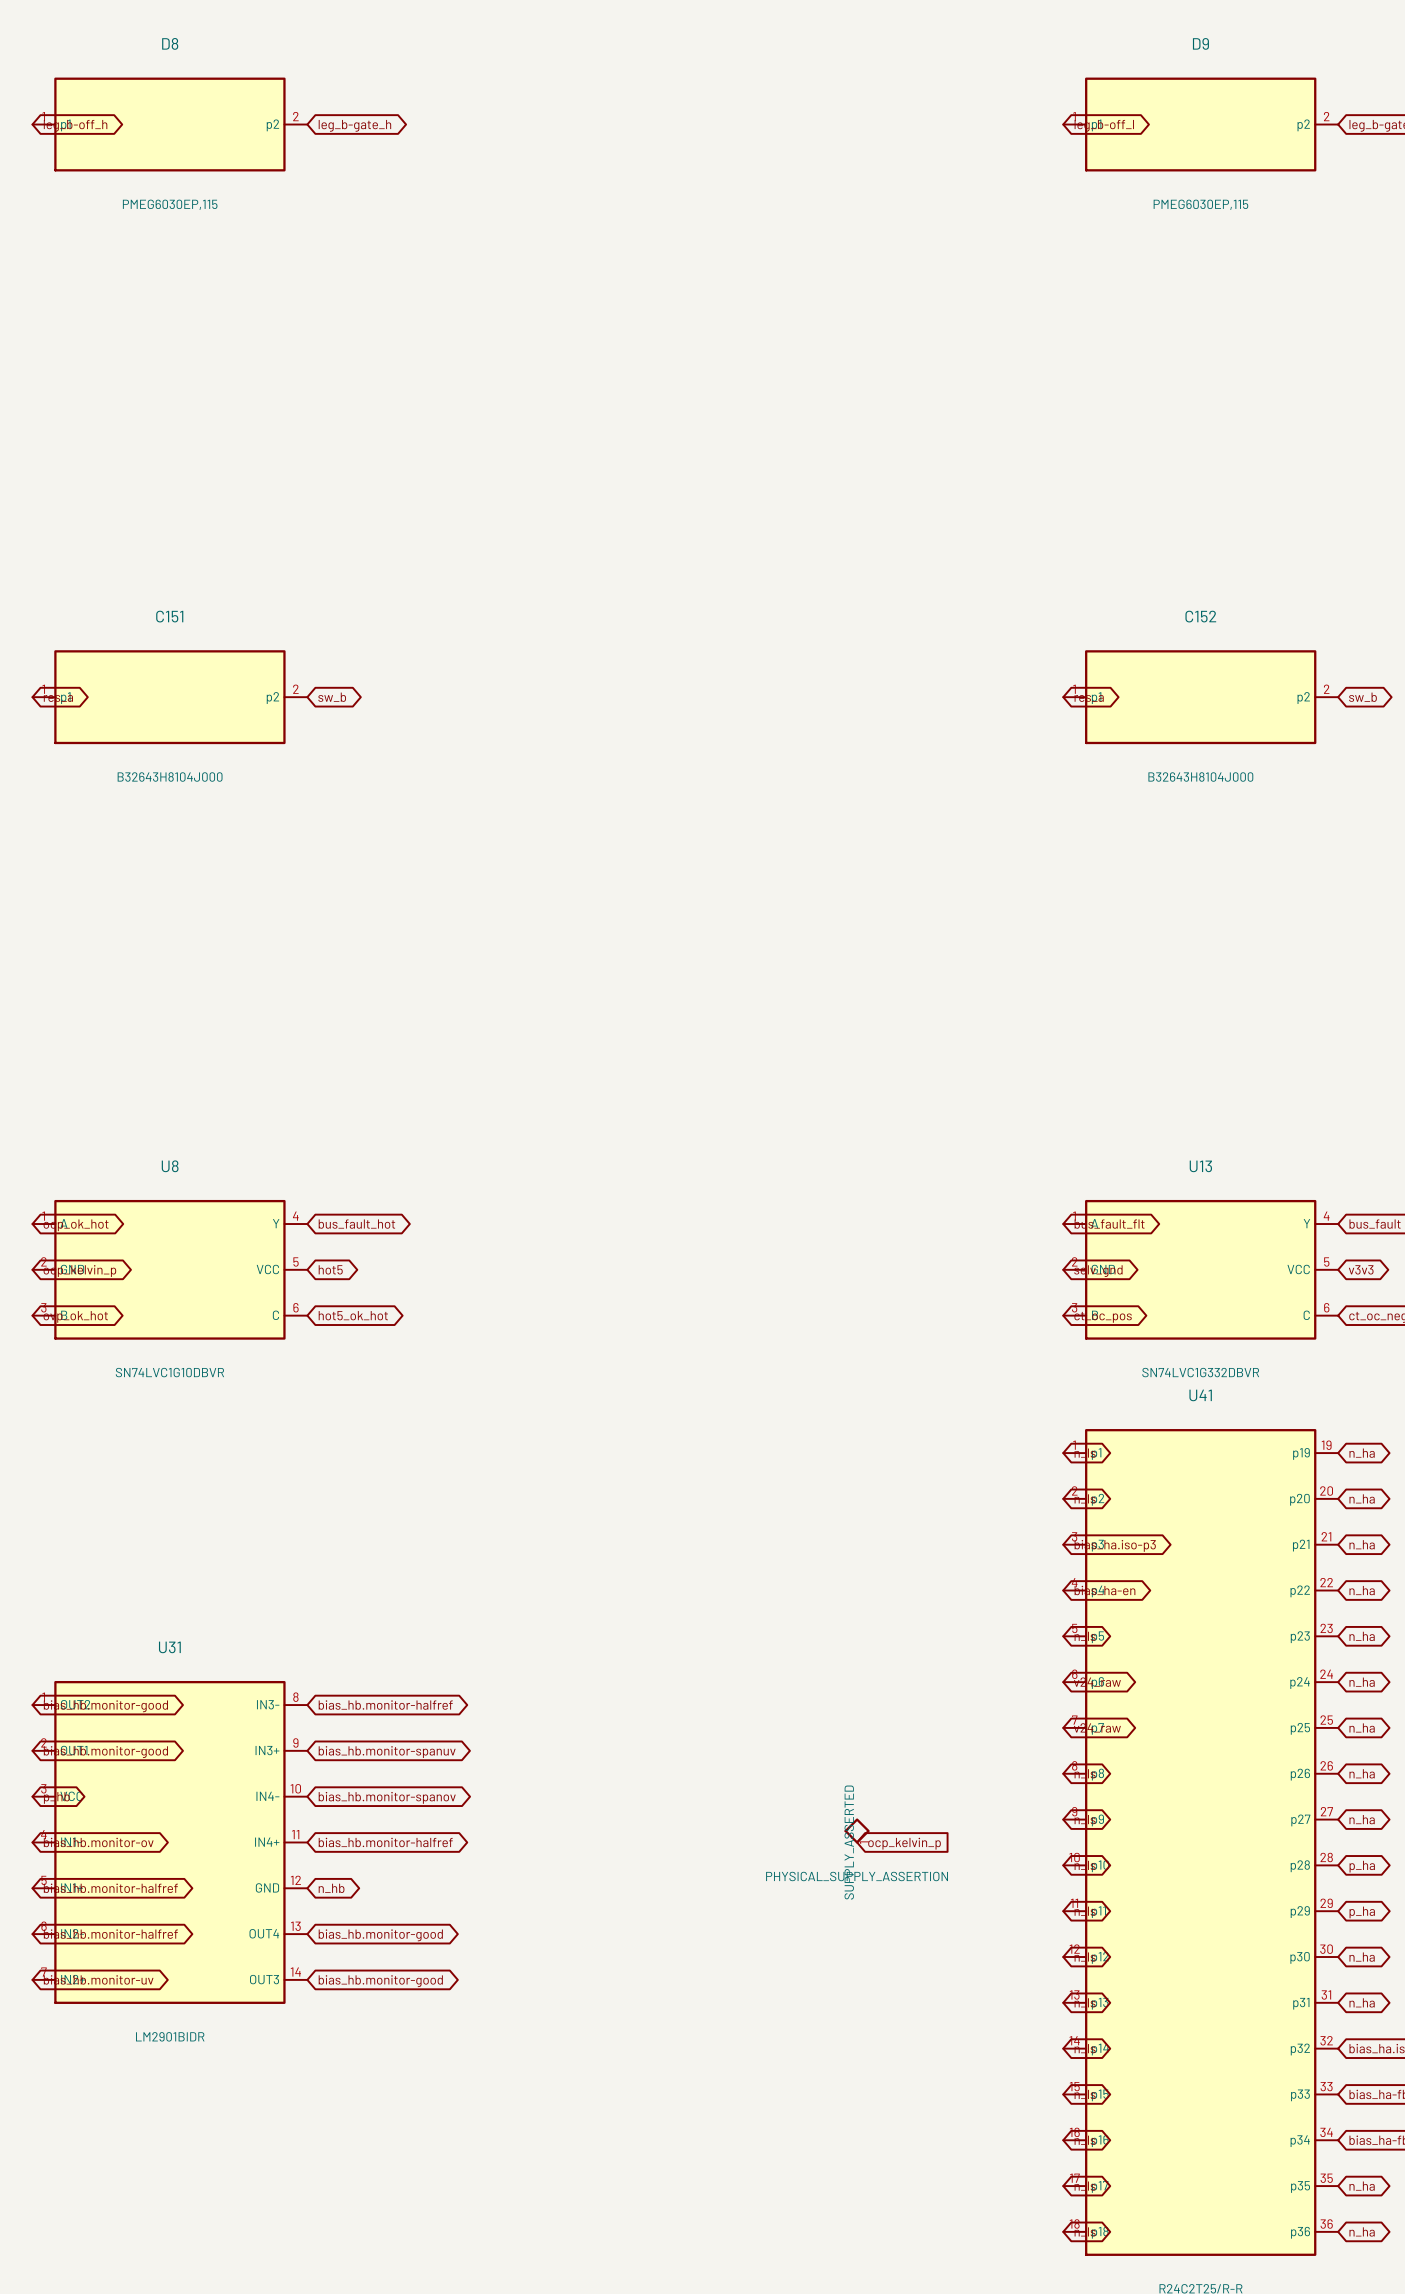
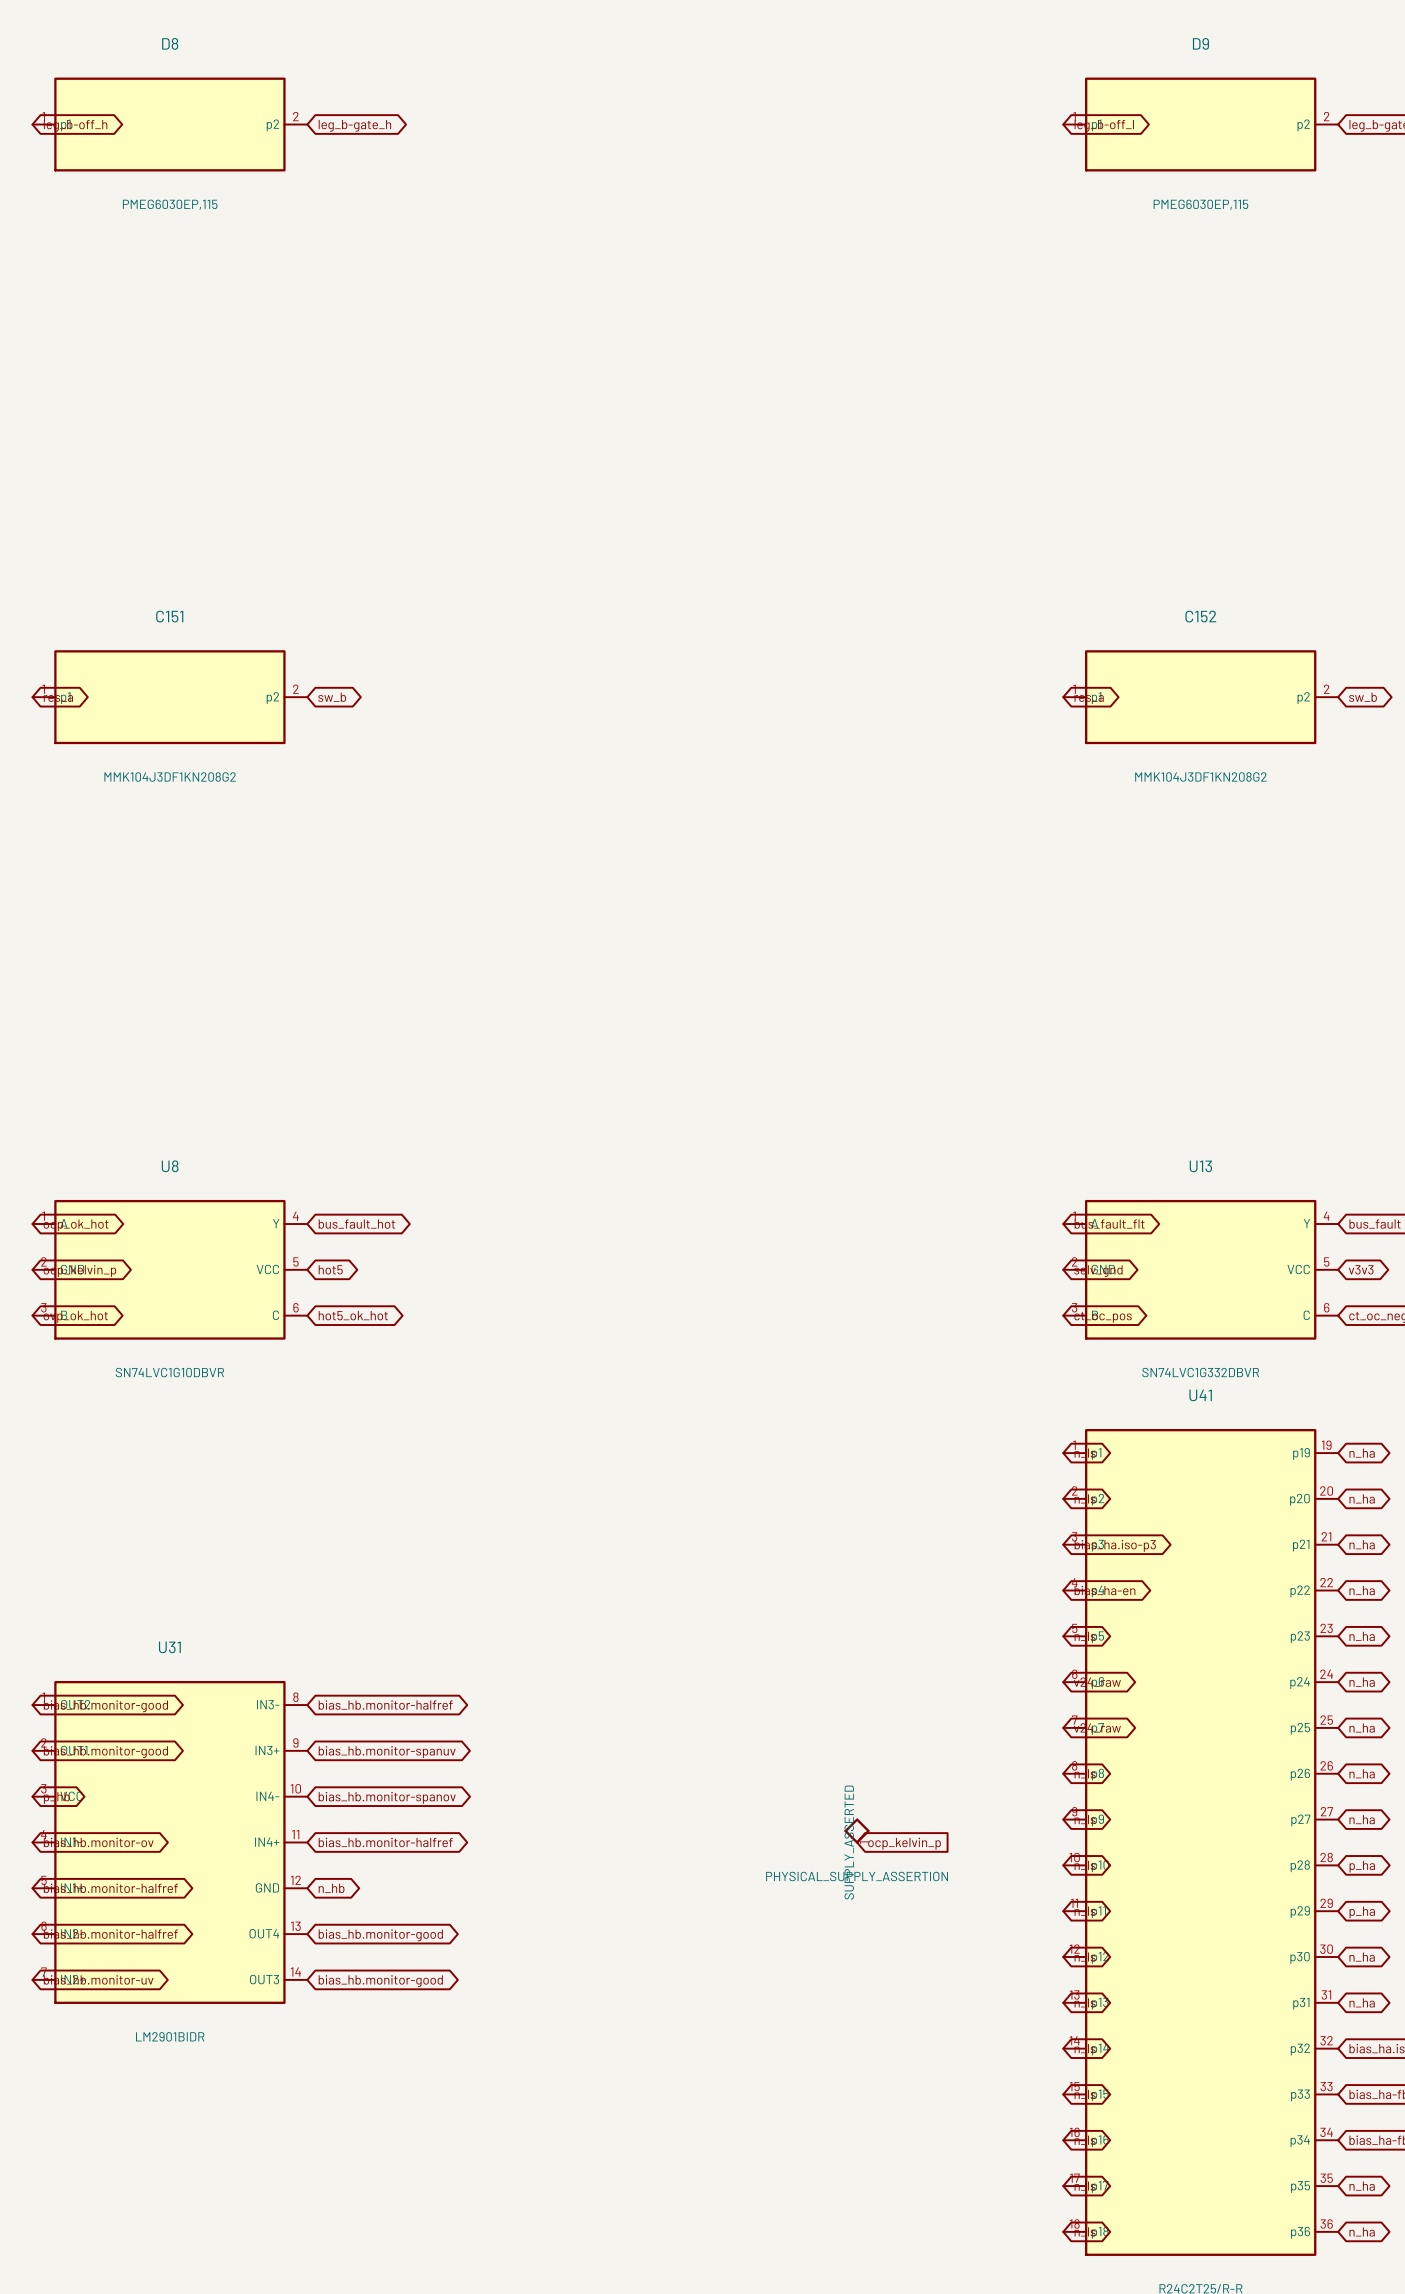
C151 value: B32643H8104J000 (170, 777) -> MMK104J3DF1KN208G2 (170, 777)
C152 value: B32643H8104J000 (1200, 777) -> MMK104J3DF1KN208G2 (1200, 777)

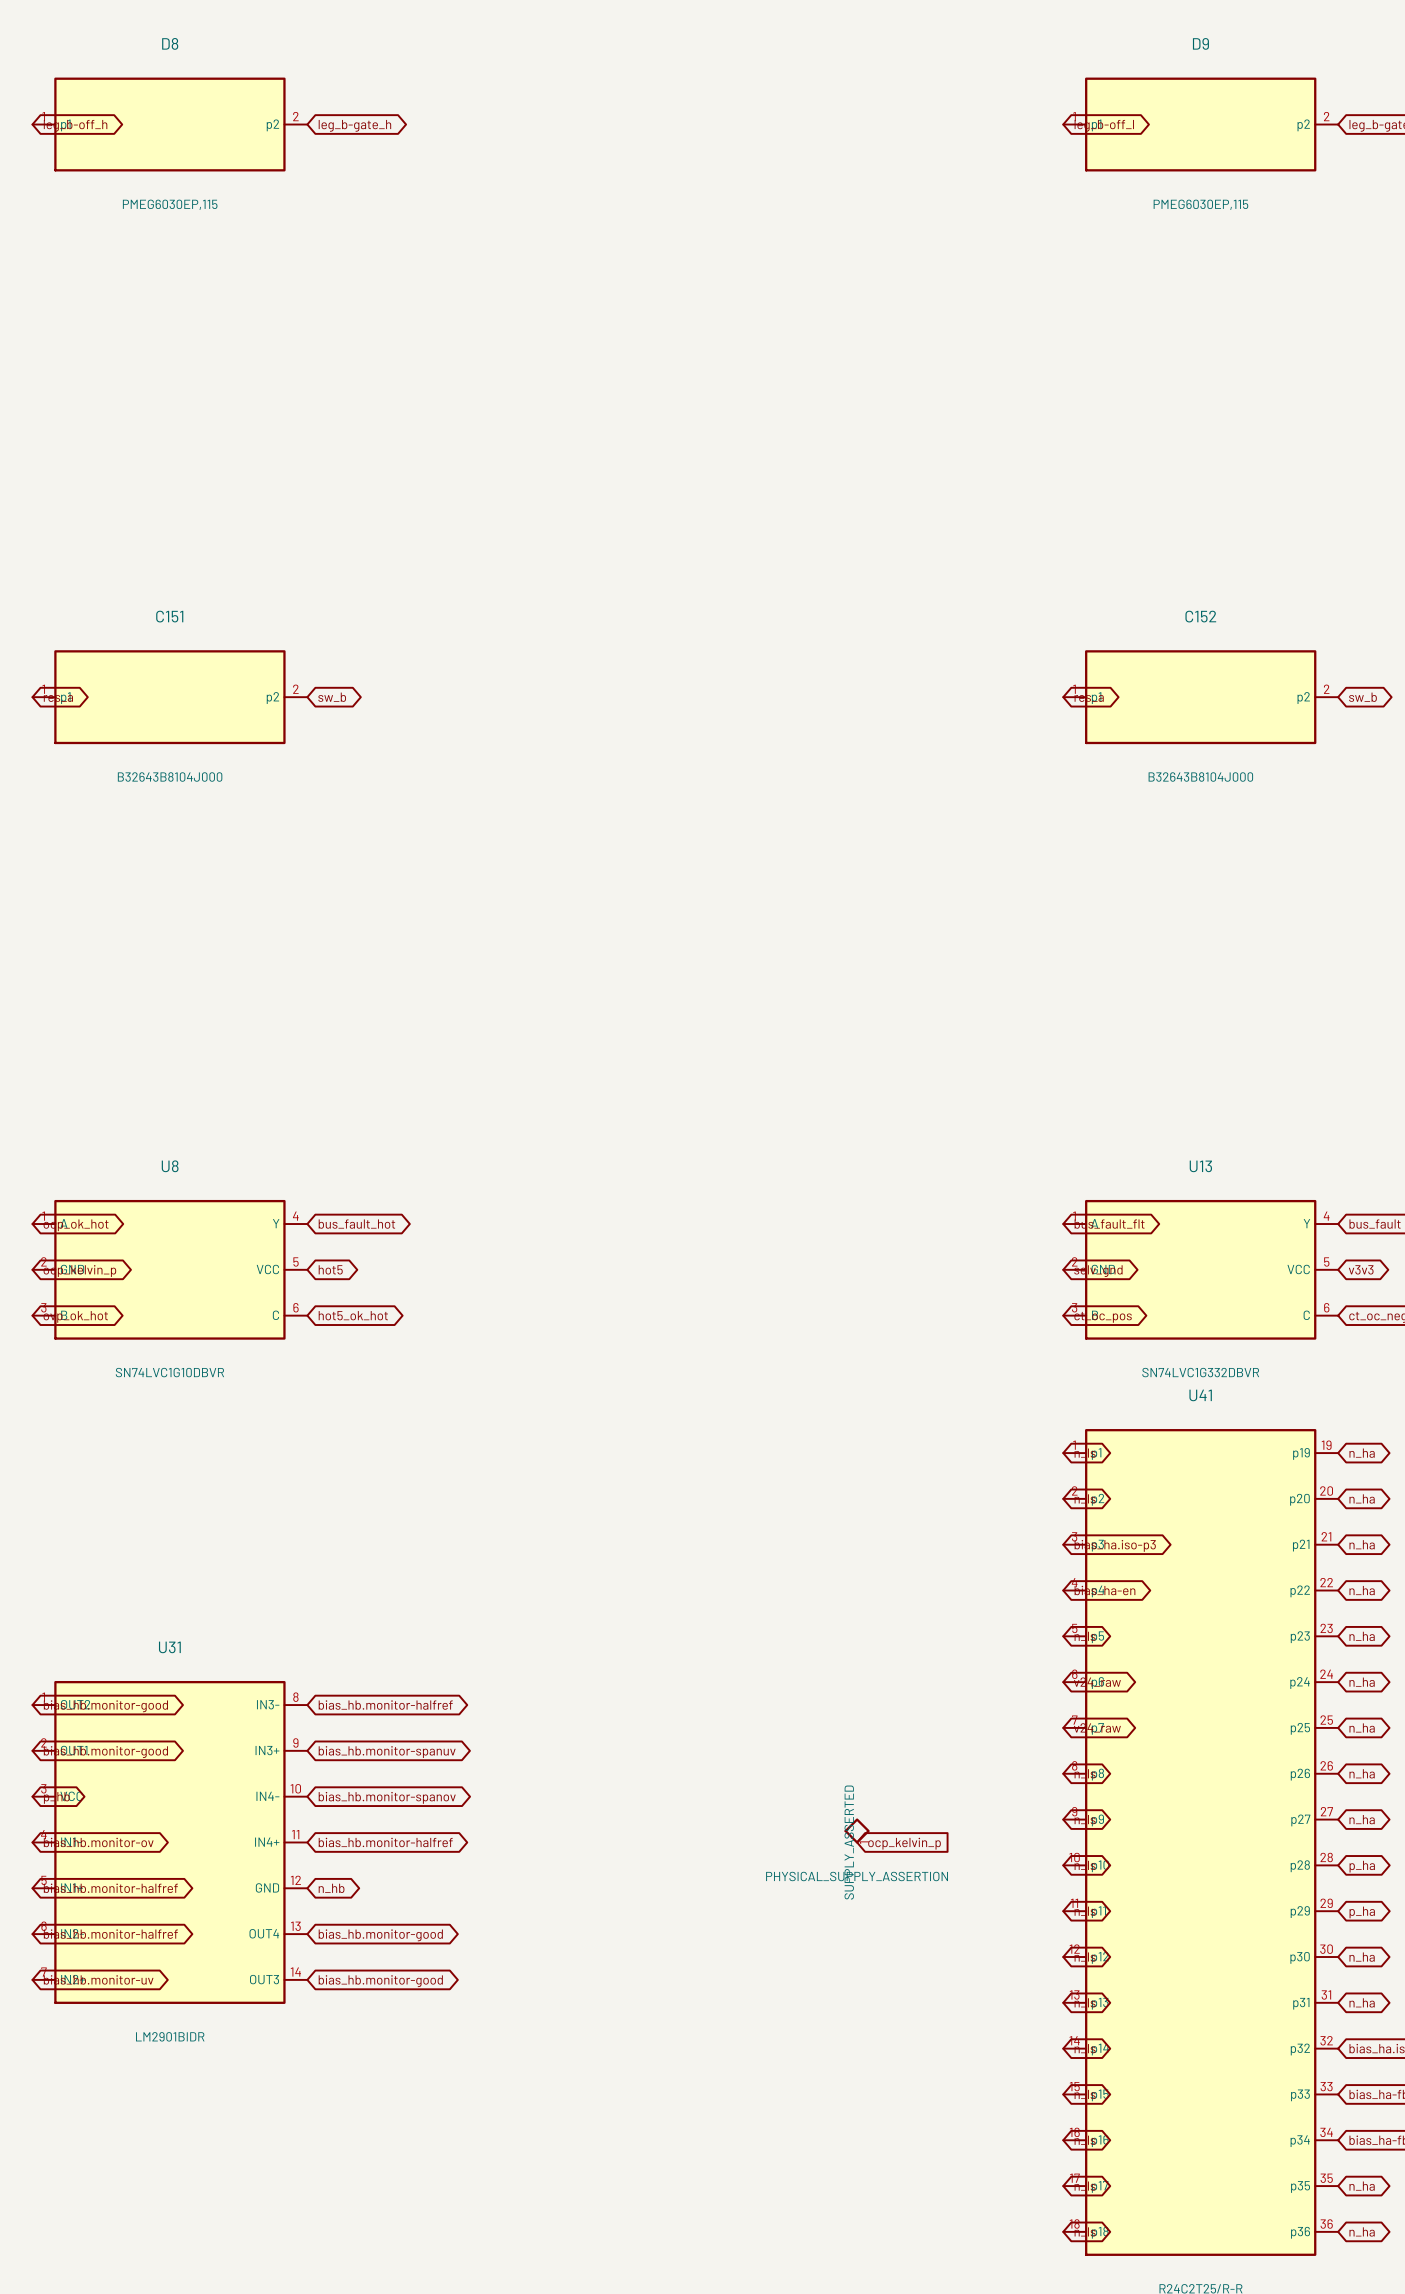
C151 value: MMK104J3DF1KN208G2 (170, 777) -> B32643B8104J000 (170, 777)
C152 value: MMK104J3DF1KN208G2 (1200, 777) -> B32643B8104J000 (1200, 777)

